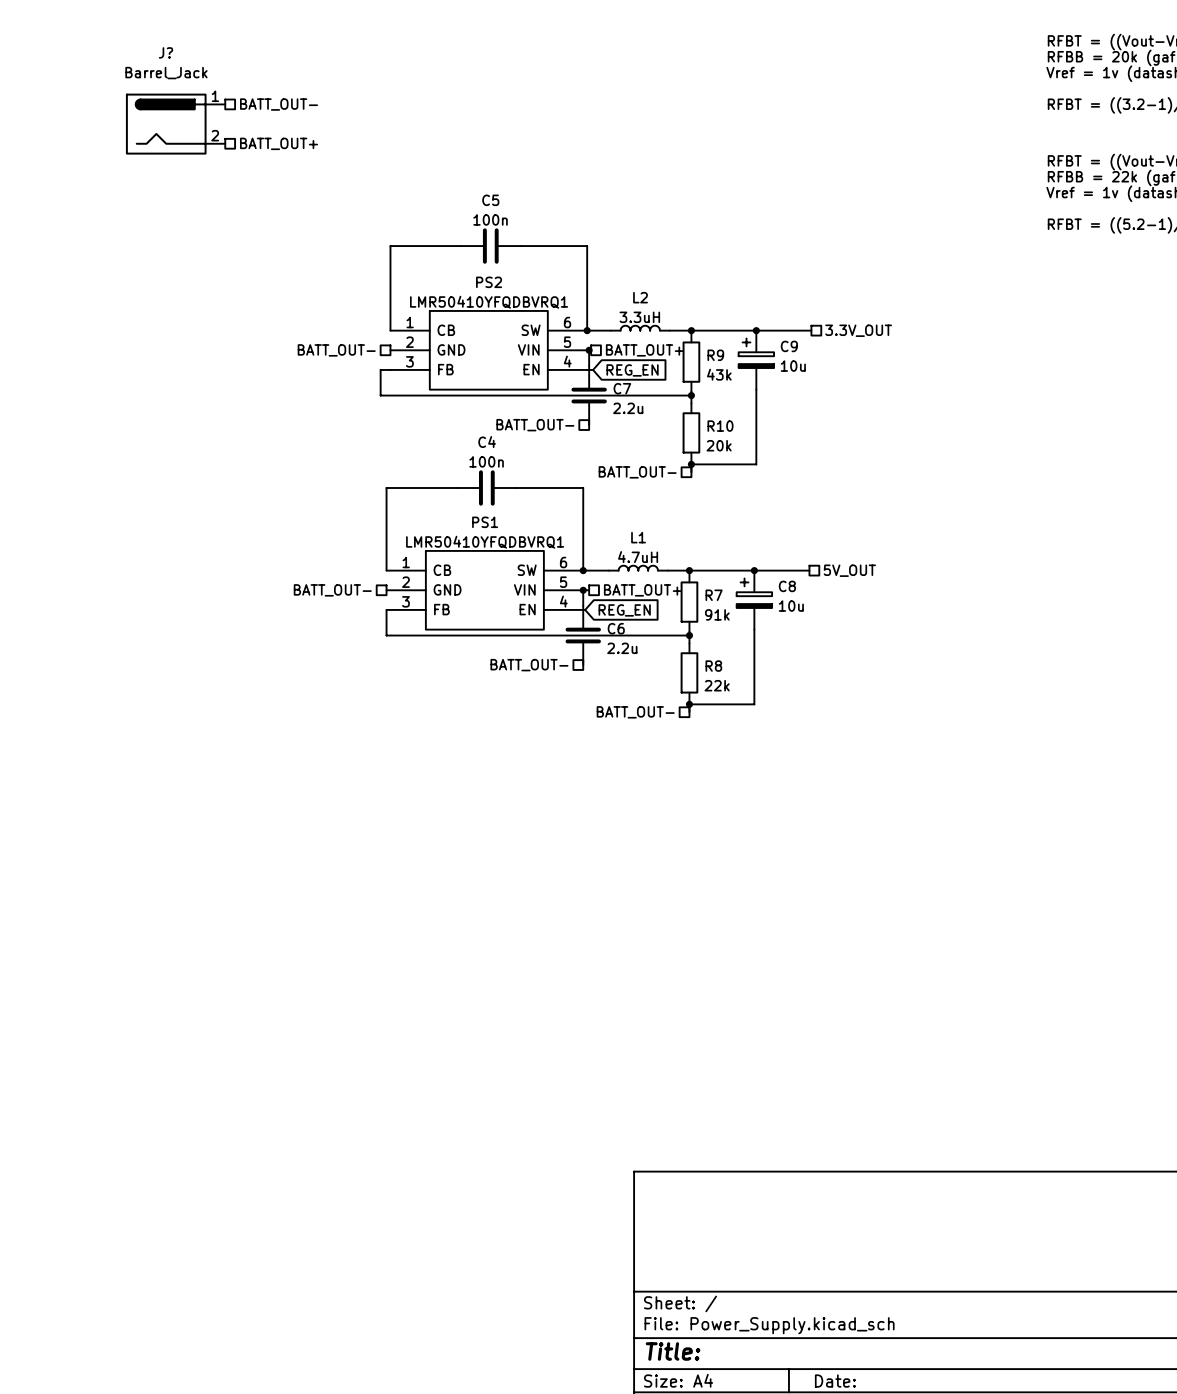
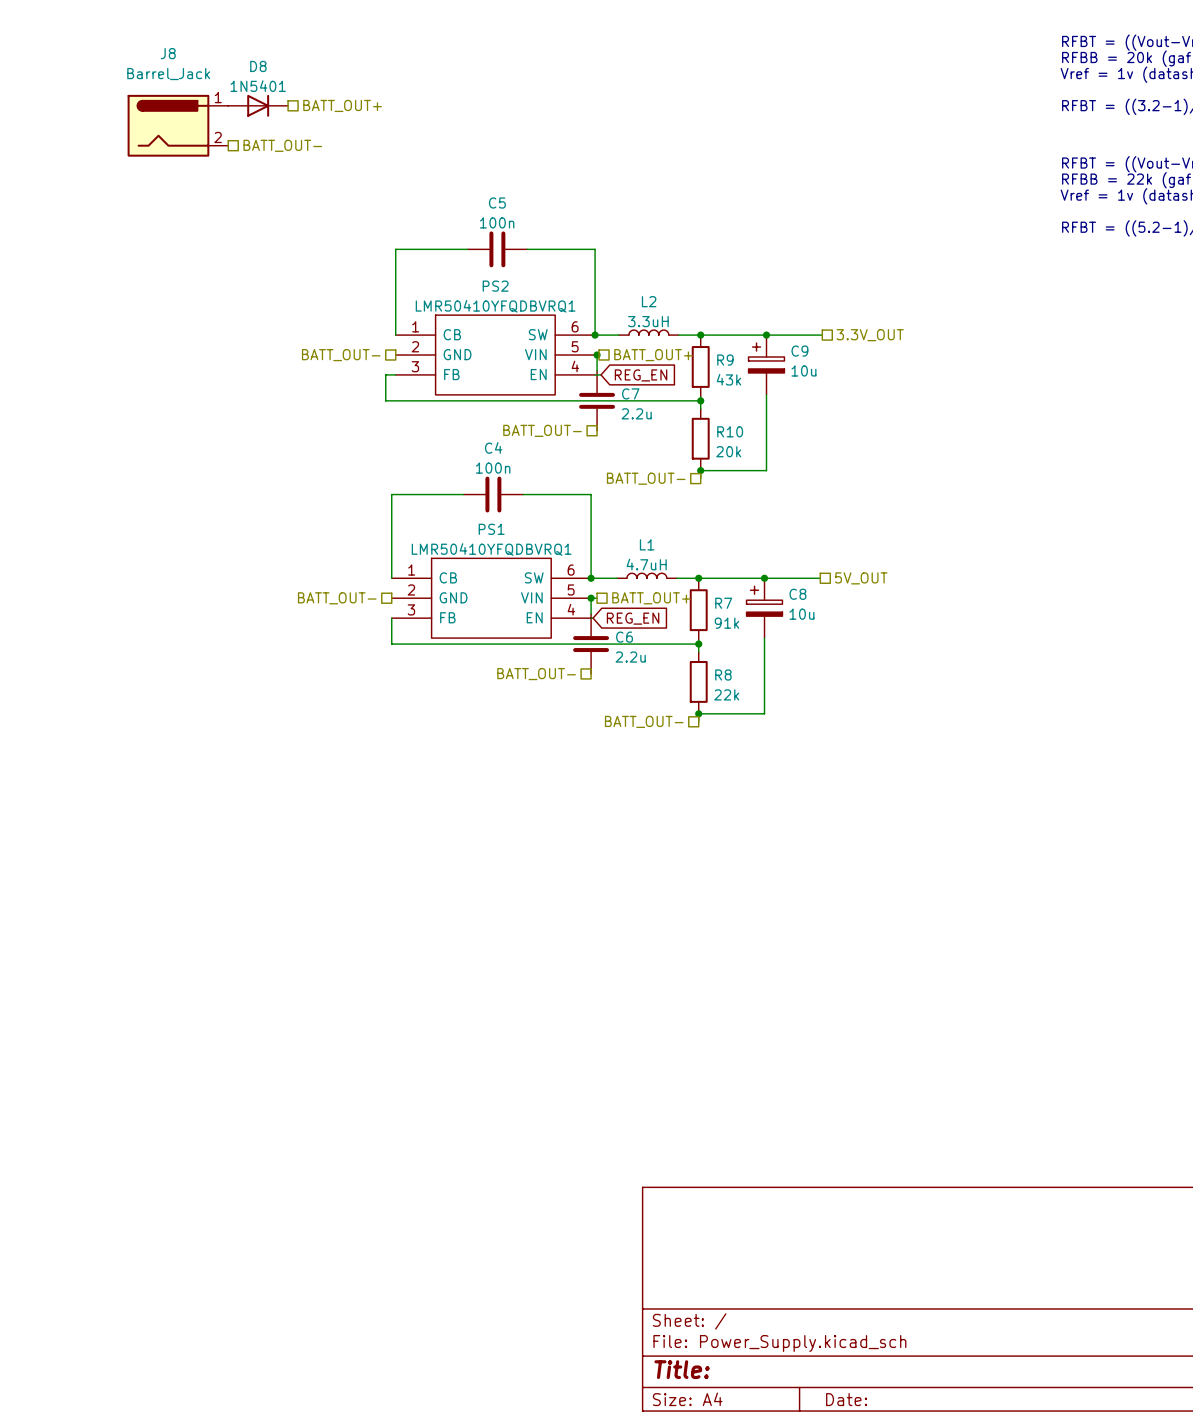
J? name: J? (166, 52) -> J8 (168, 53)
D8: none -> 1N5401 (258, 105)
hierarchical label: BATT_OUT- (279, 104) -> BATT_OUT+ (342, 105)
hierarchical label: BATT_OUT+ (279, 143) -> BATT_OUT- (282, 145)

